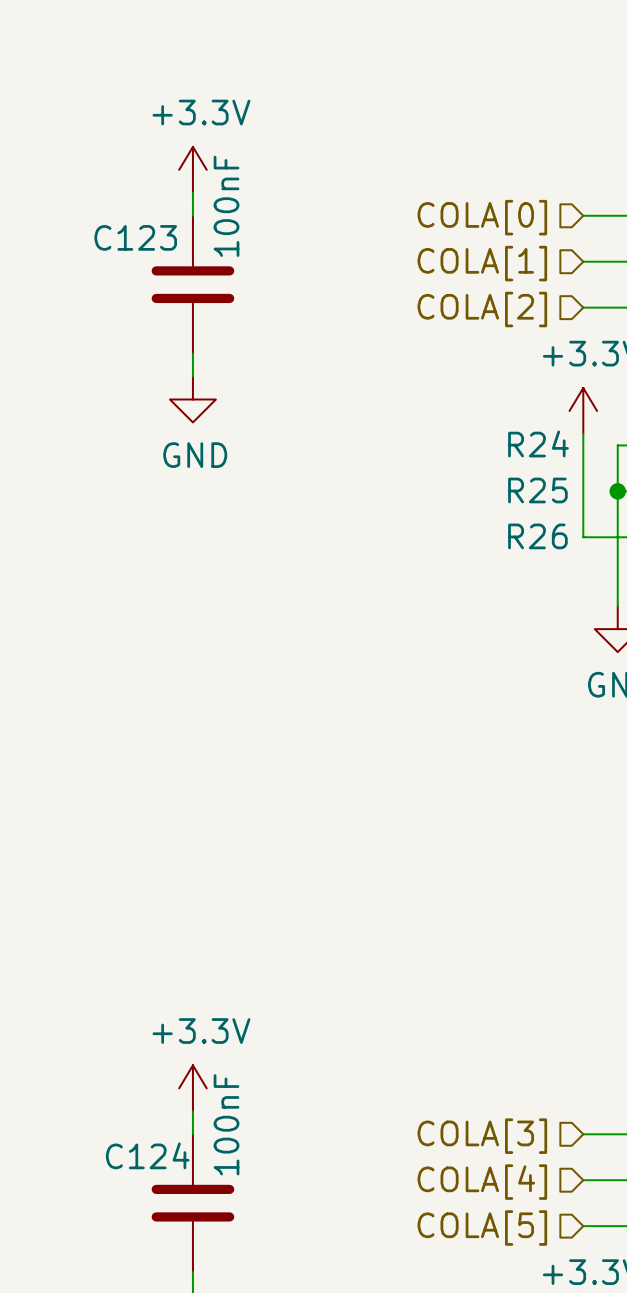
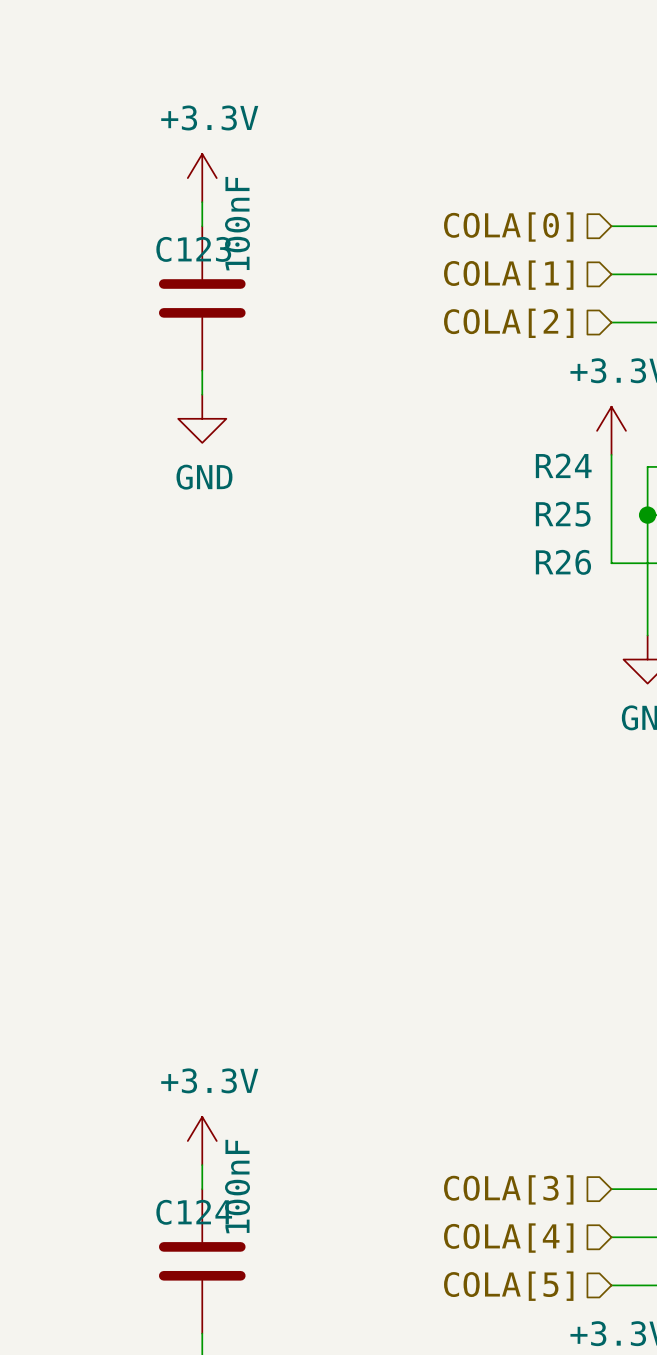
C123 name position: C123 (135, 237) -> C123 (193, 249)
C124 name position: C124 (147, 1155) -> C124 (194, 1212)

